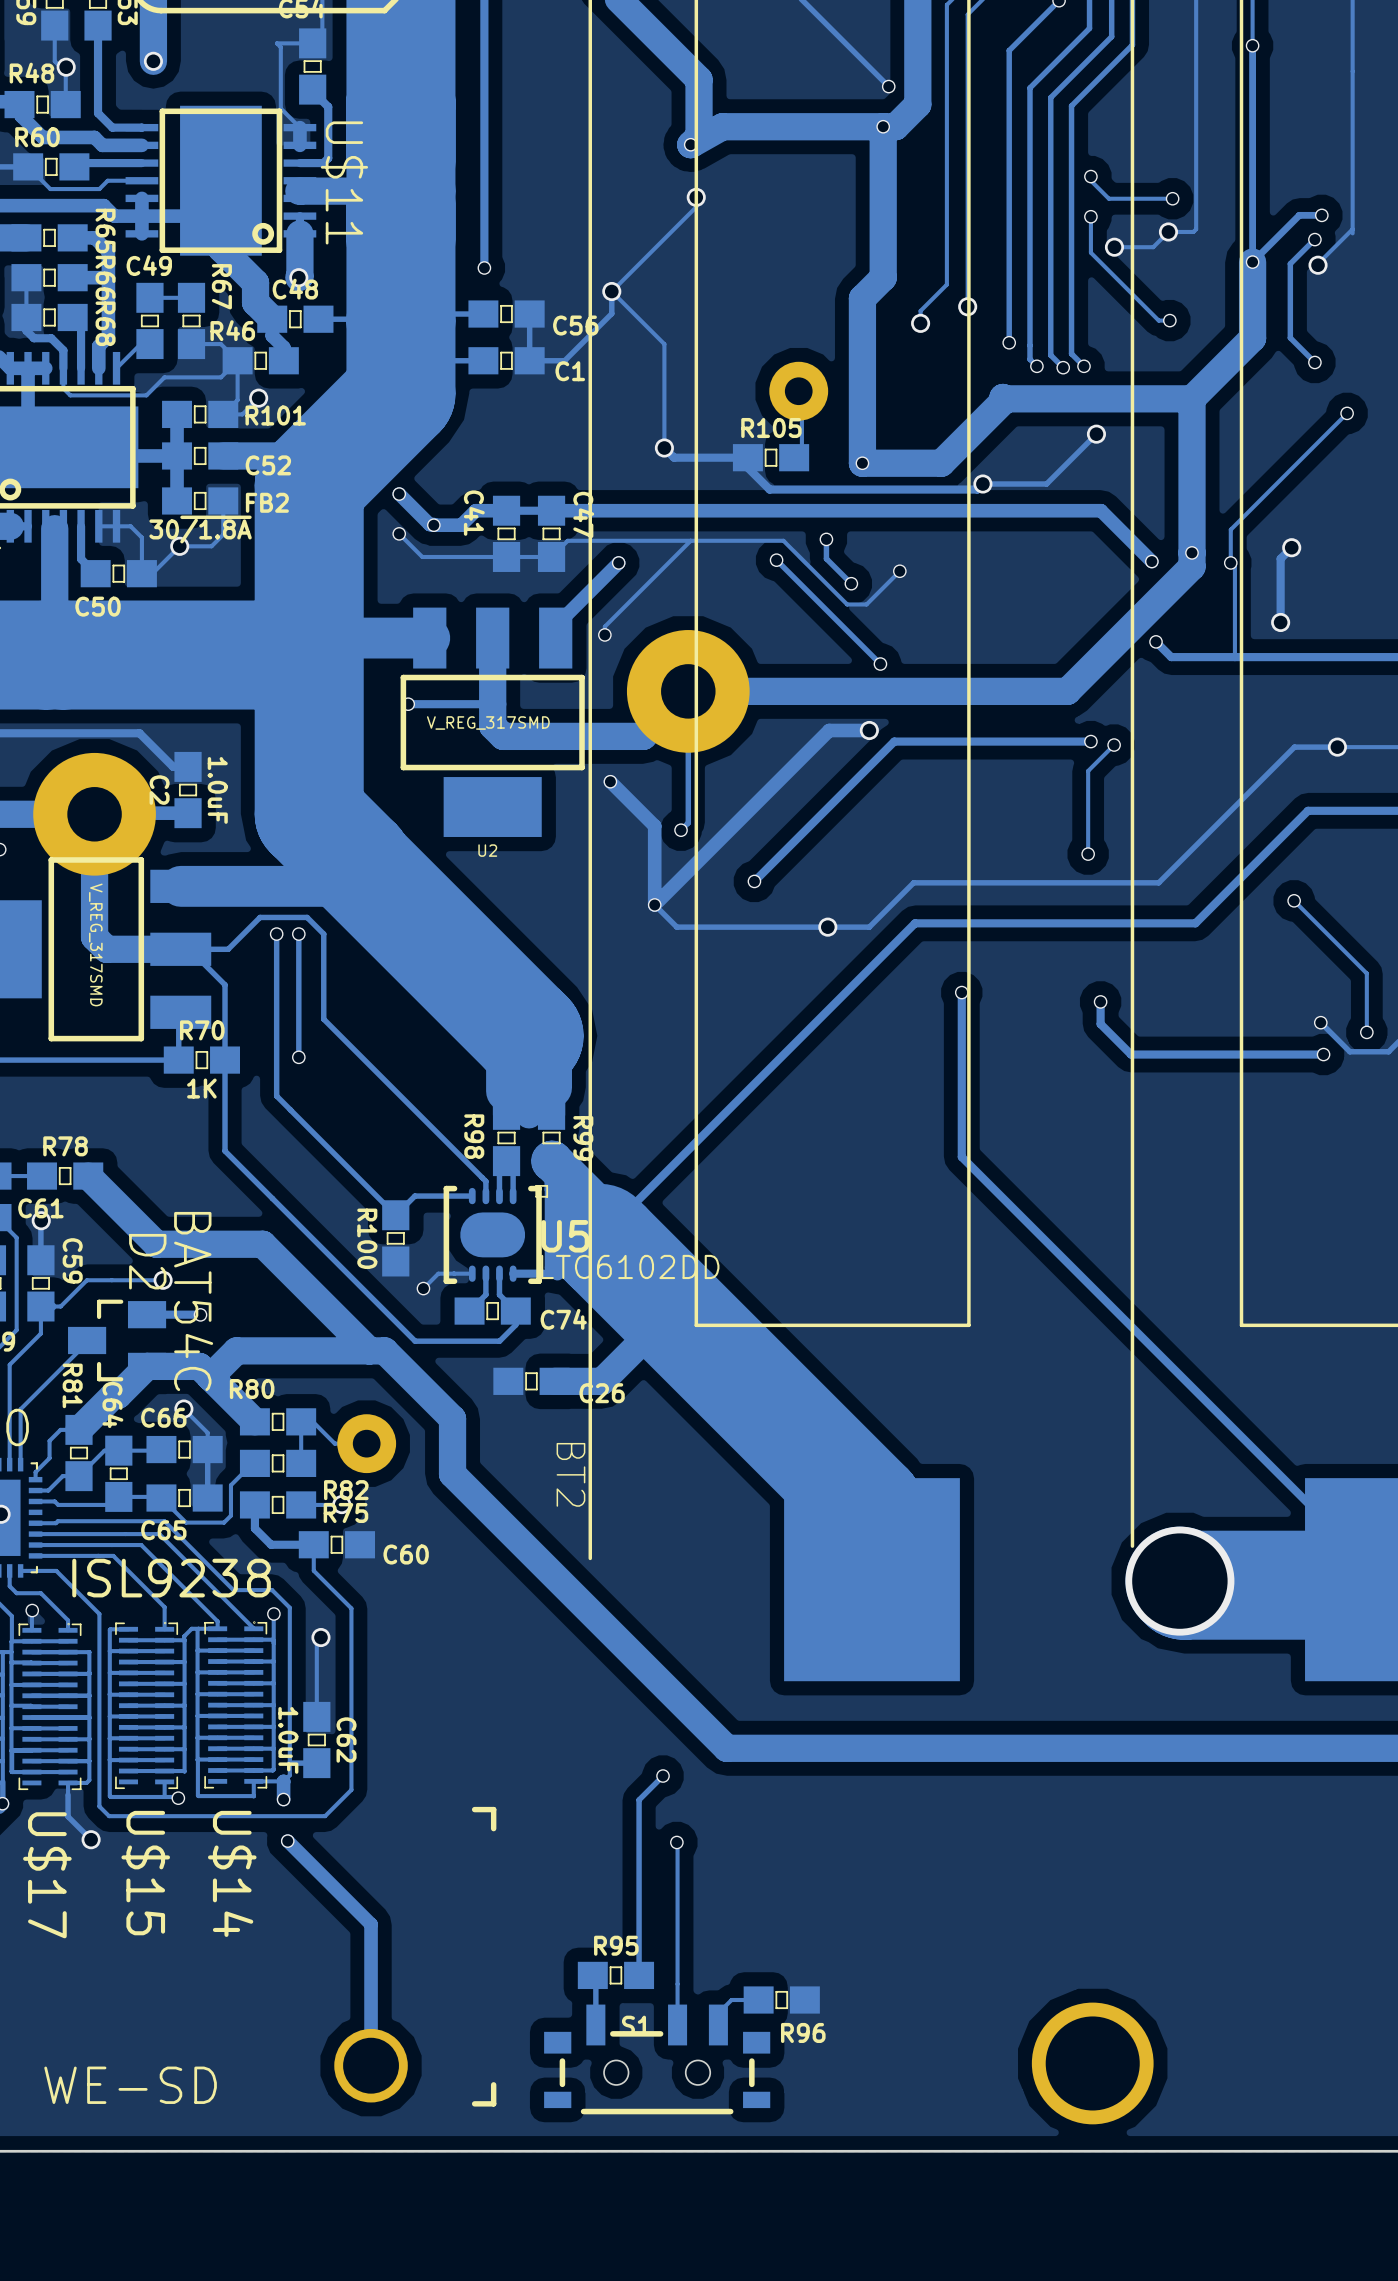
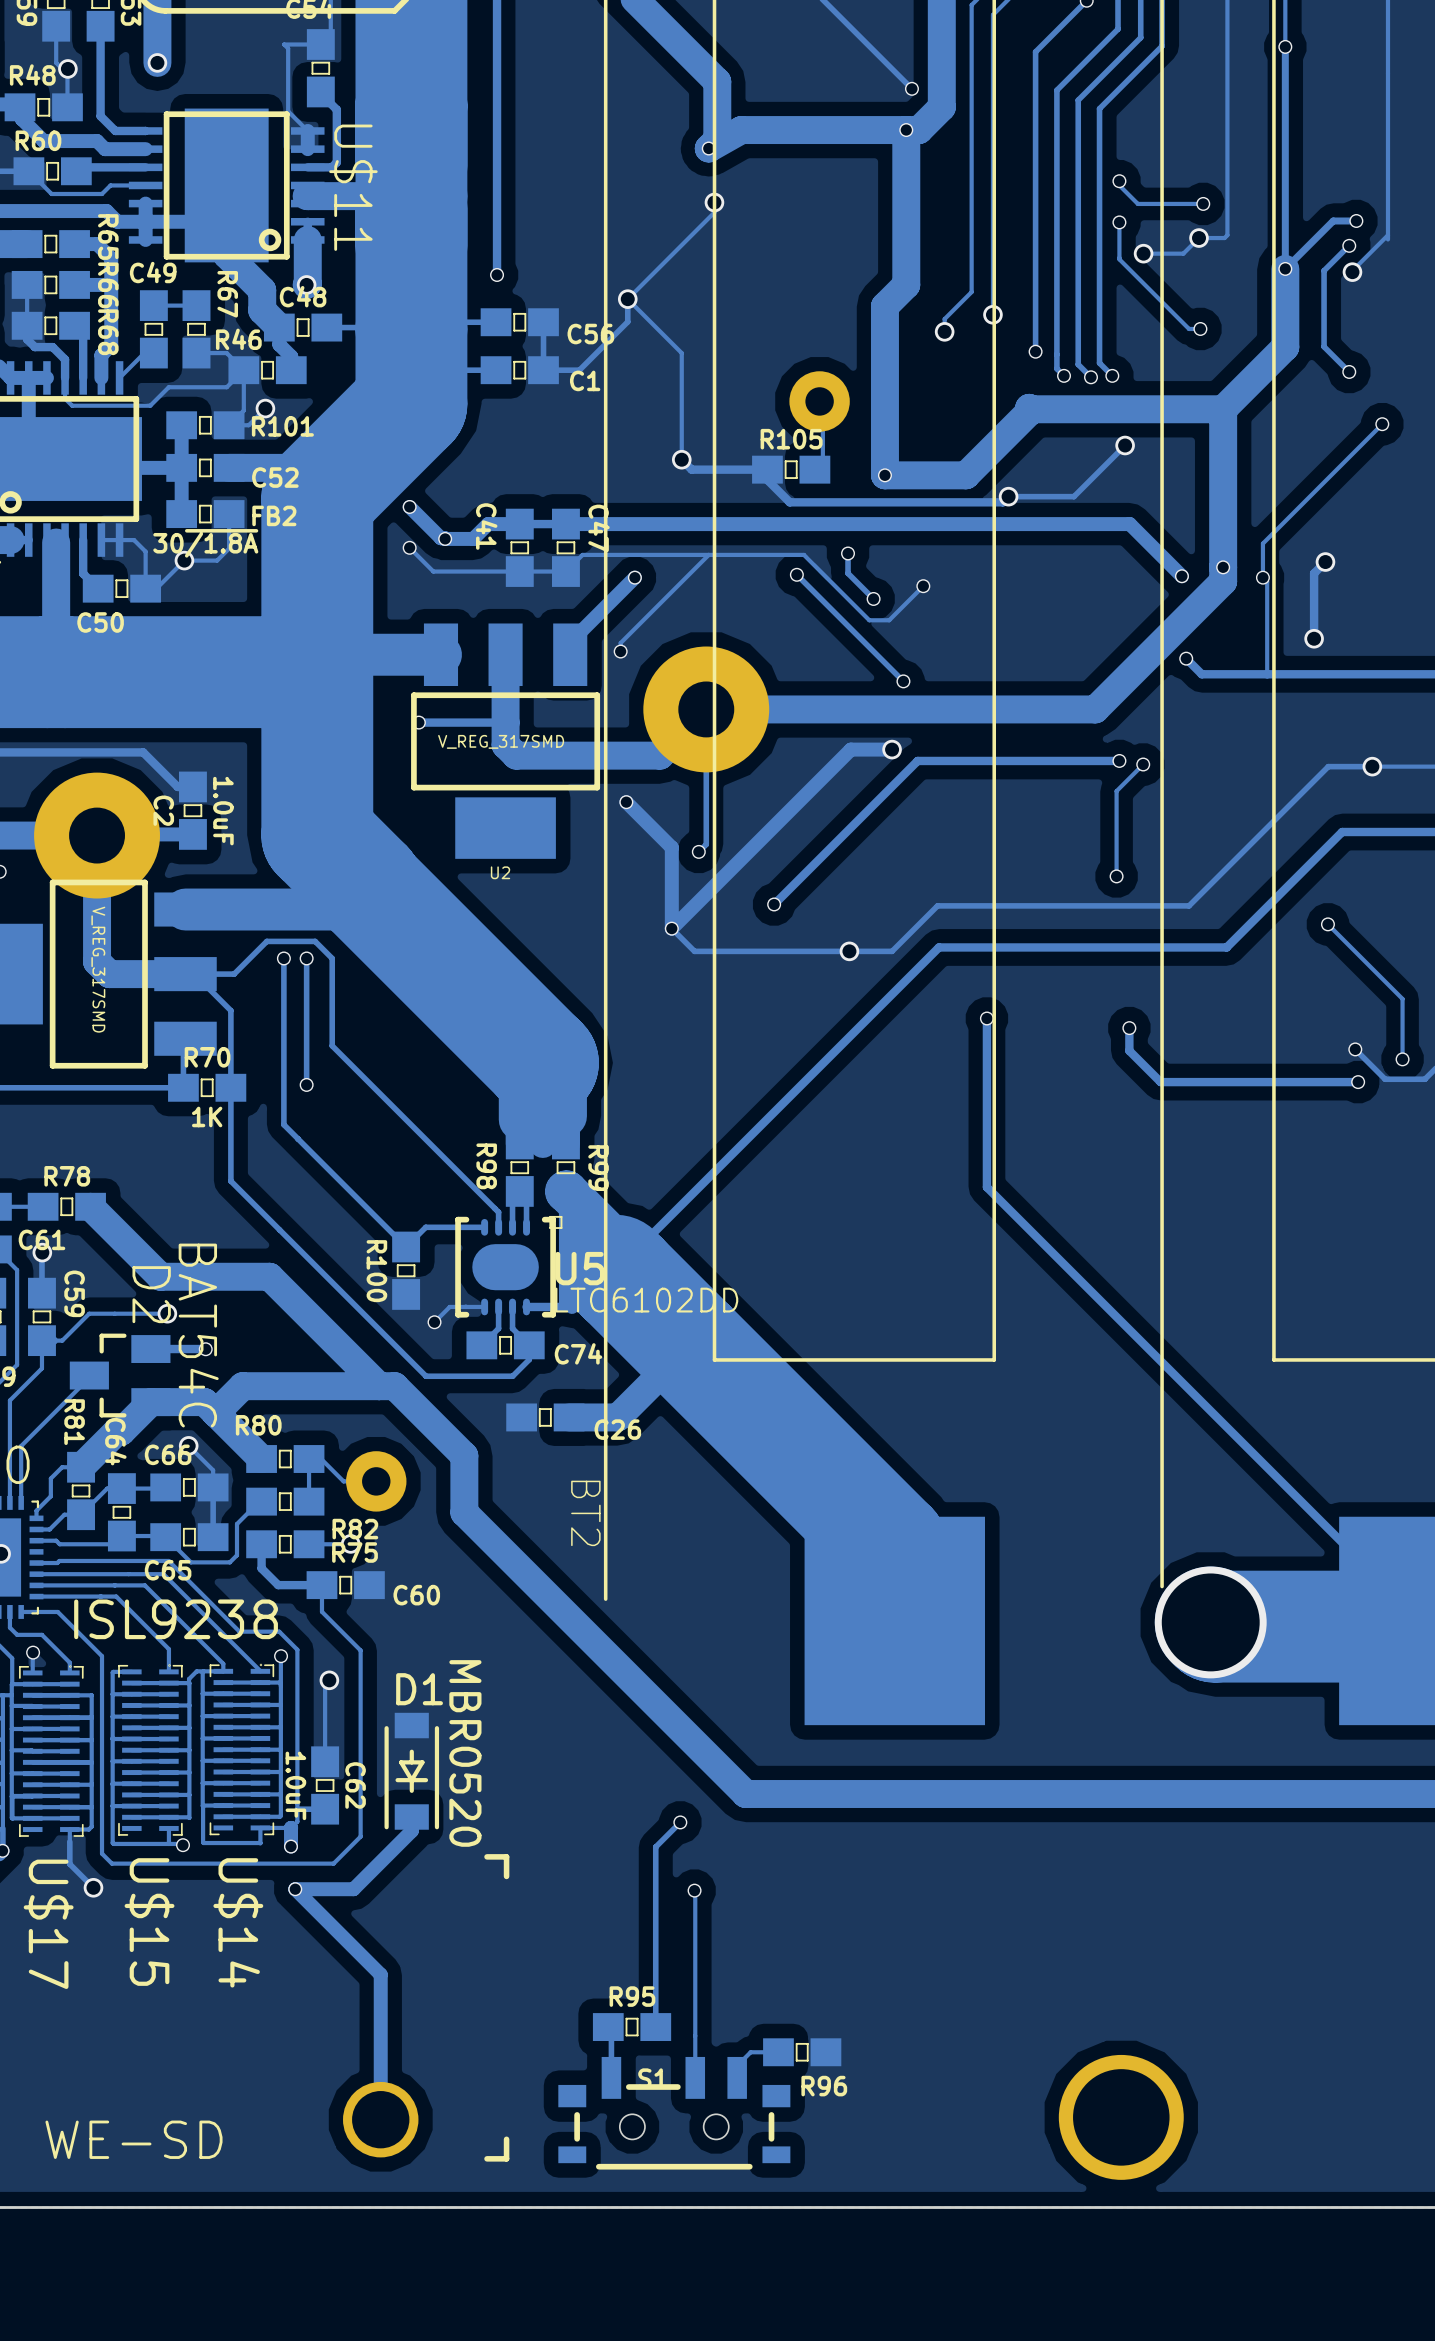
D1: none -> MBR0520 (411, 1771)
track: none -> (411, 1817) (411, 1830) (353, 1889) (295, 1889)

